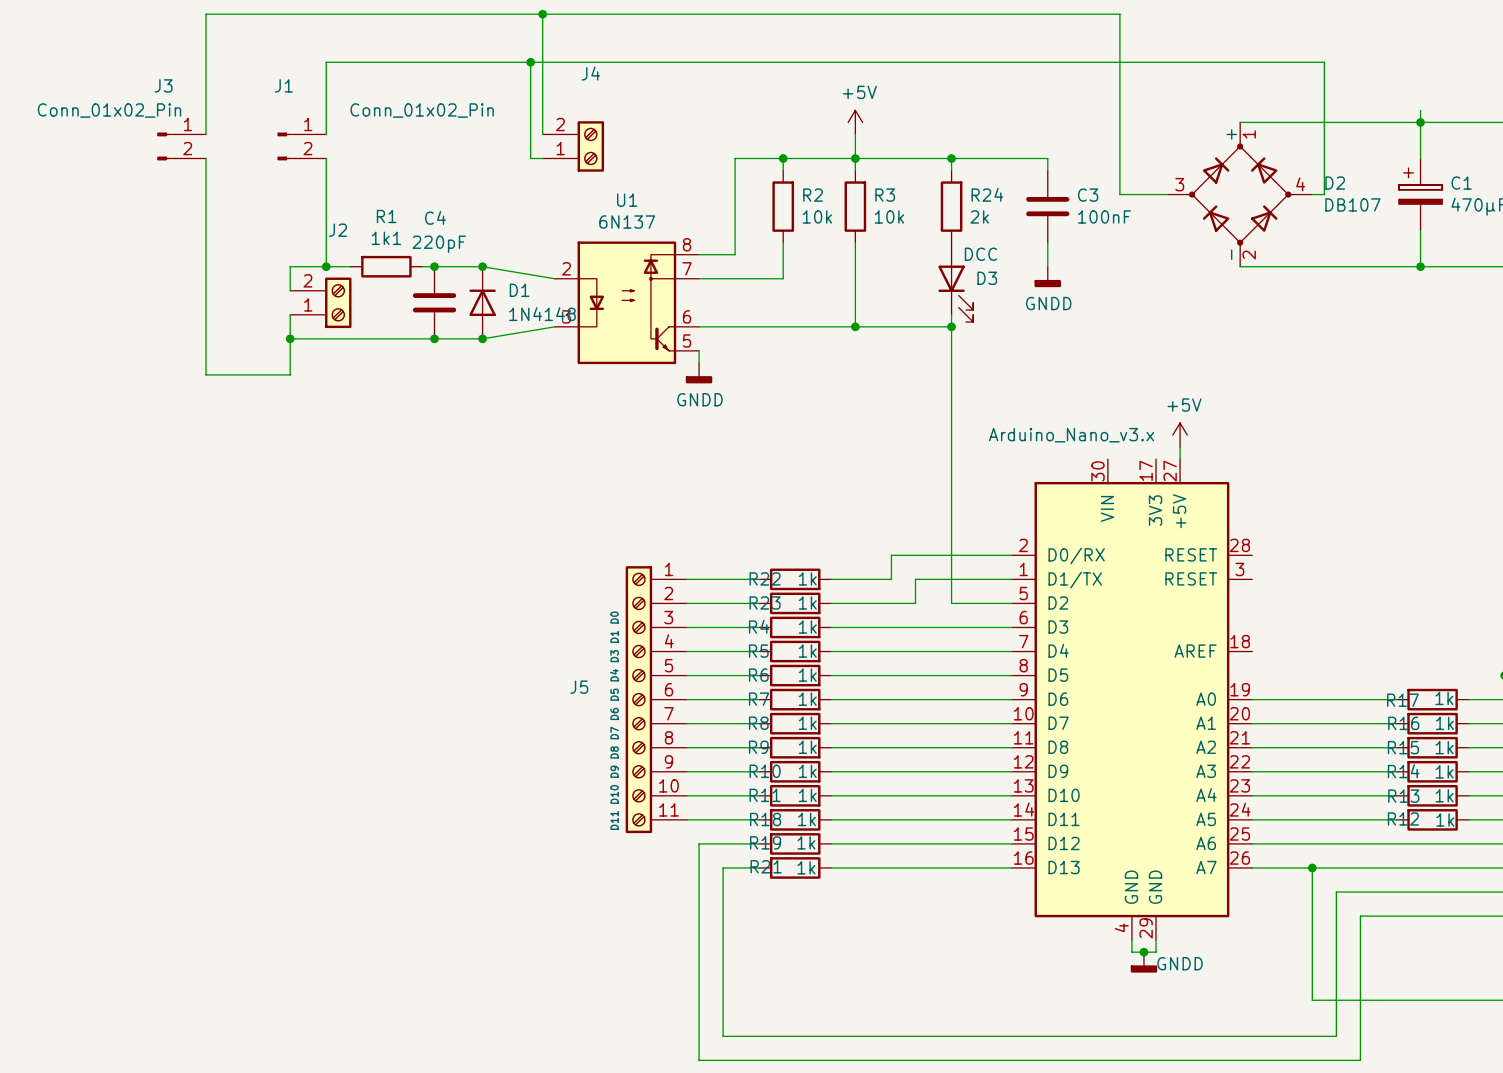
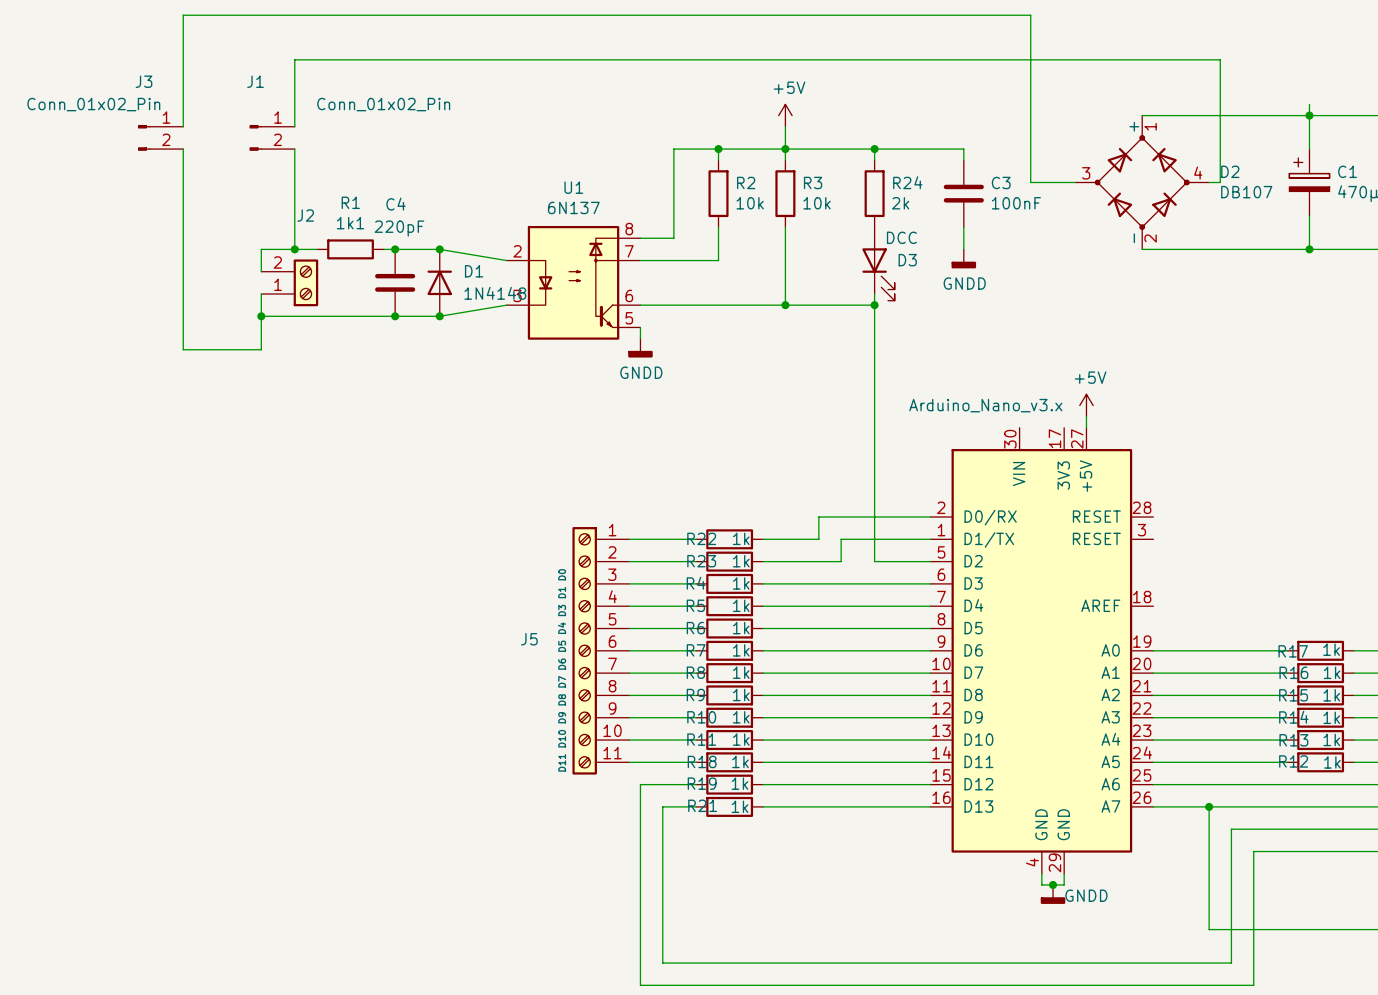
wire: (542, 14) (542, 134) -> none
junction: (542, 14) -> none
wire: (530, 62) (530, 158) (542, 158) -> none
junction: (530, 62) -> none
J4: (573, 146) -> none

